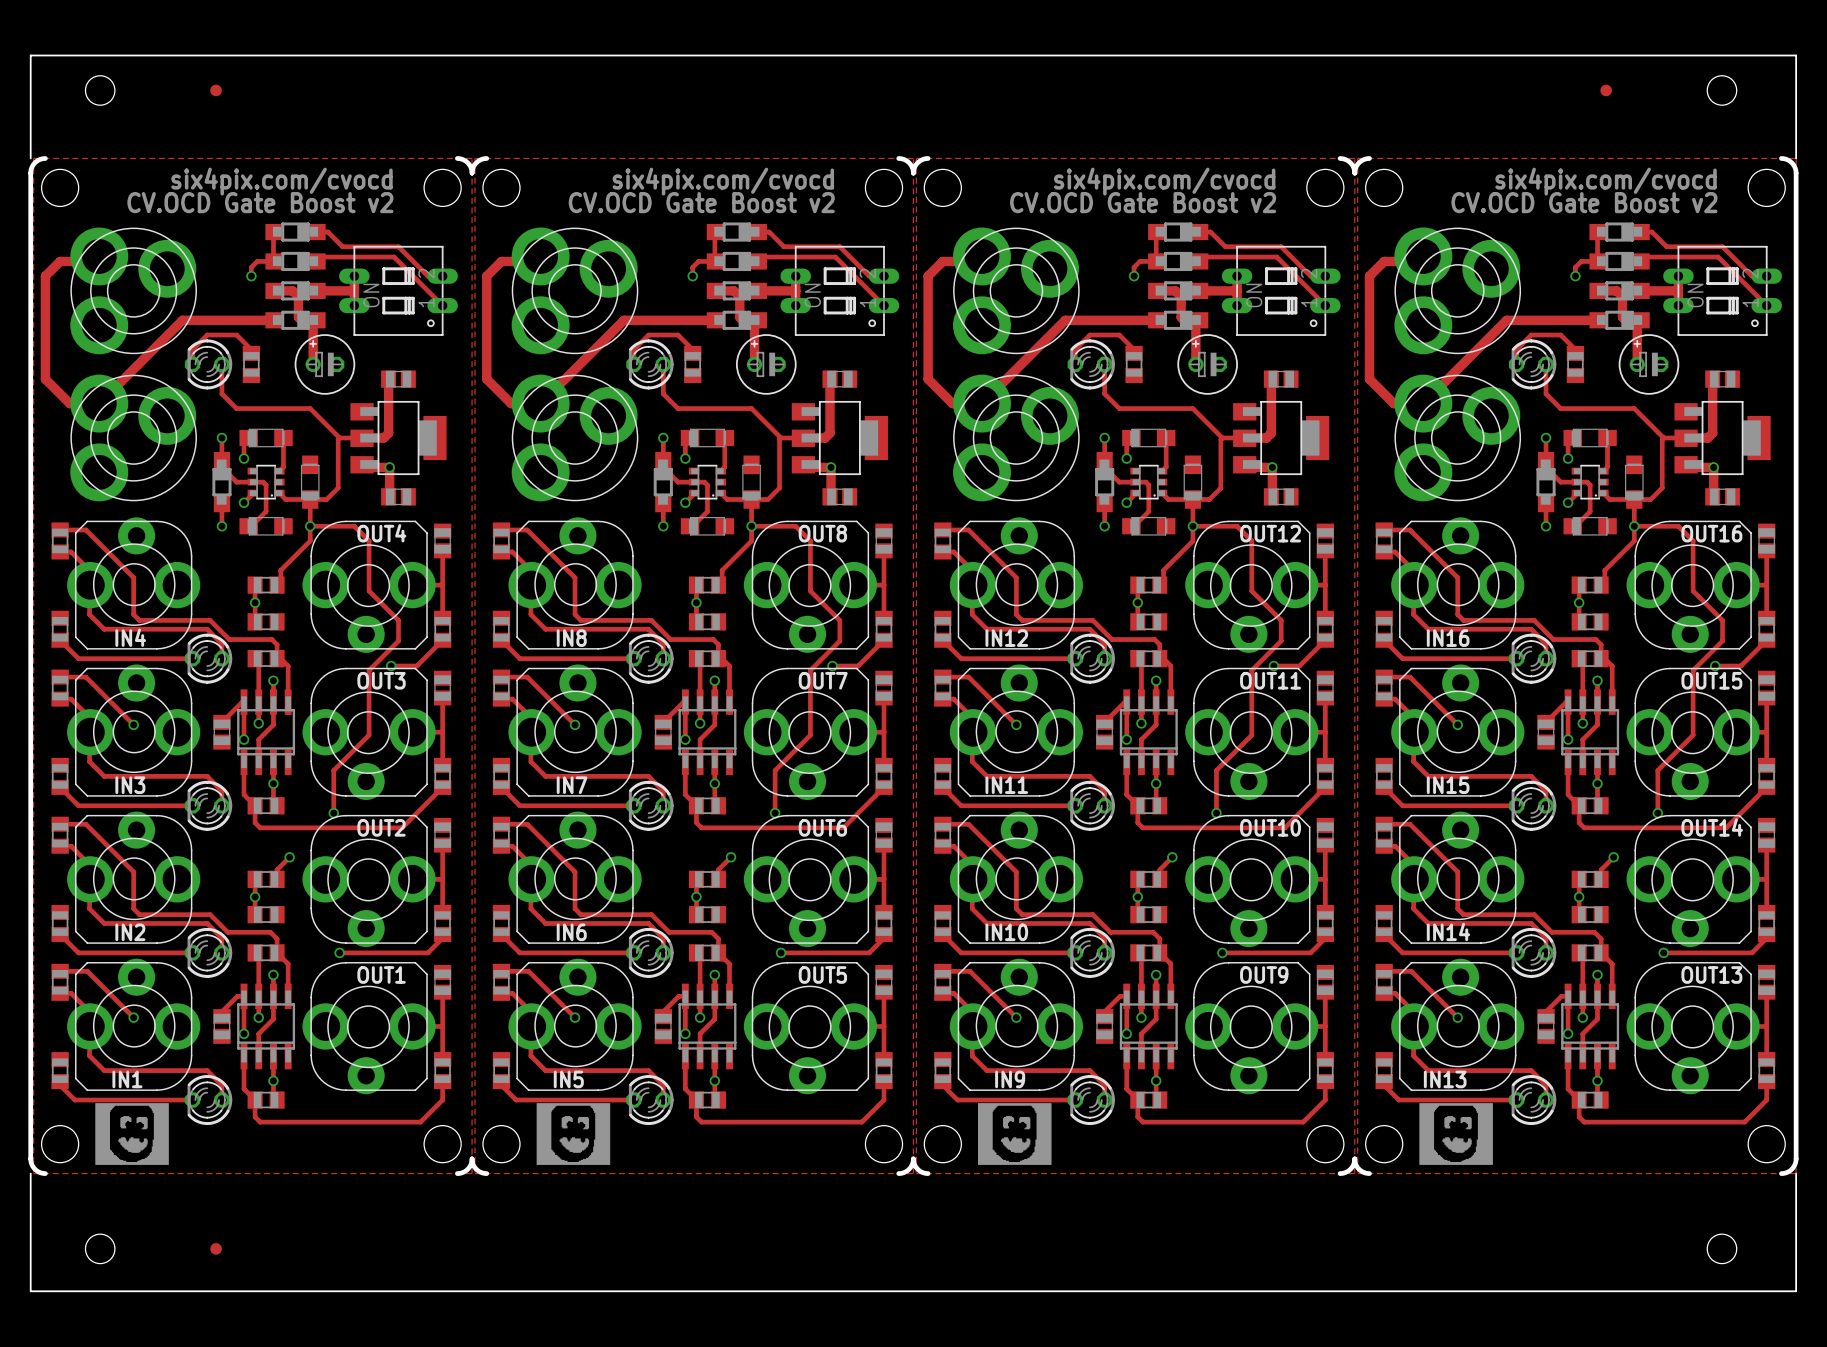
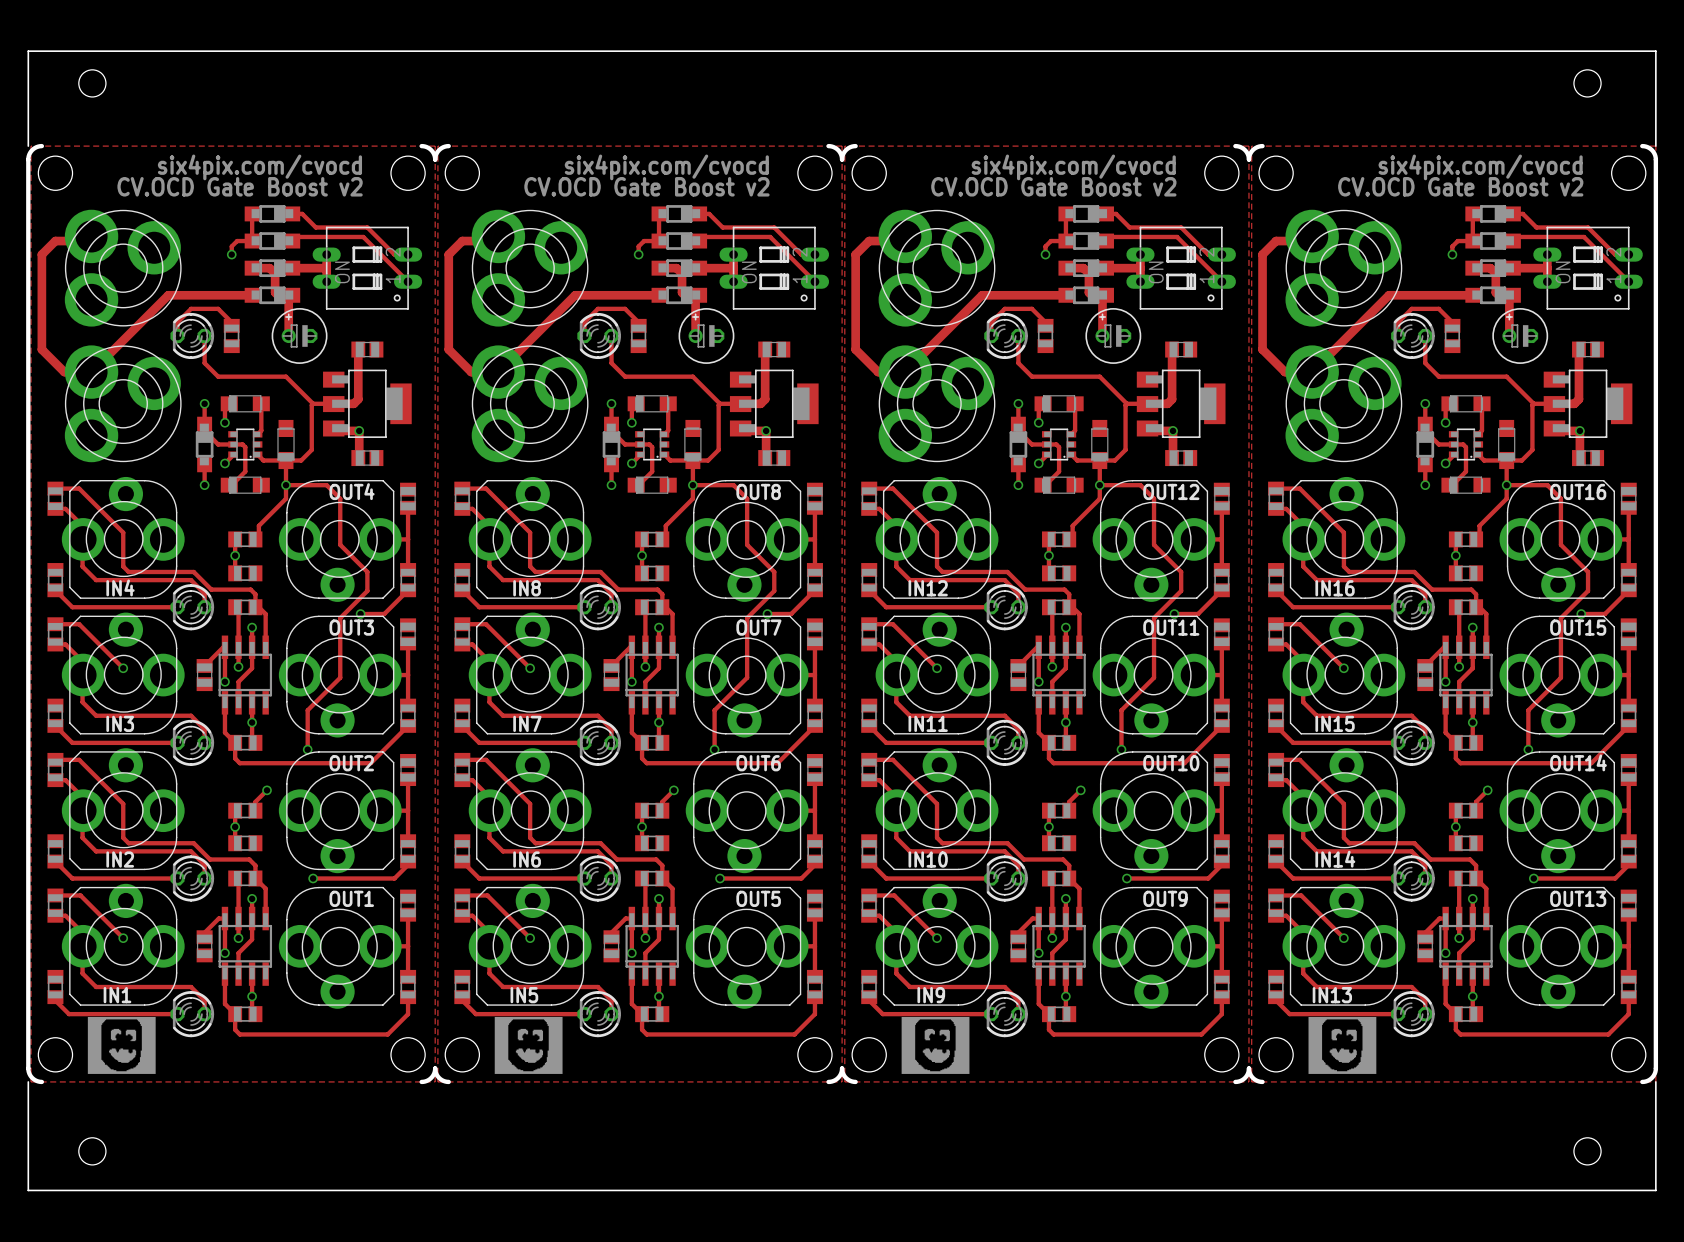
part: (216, 90) -> none
part: (1606, 90) -> none
part: (216, 1248) -> none

